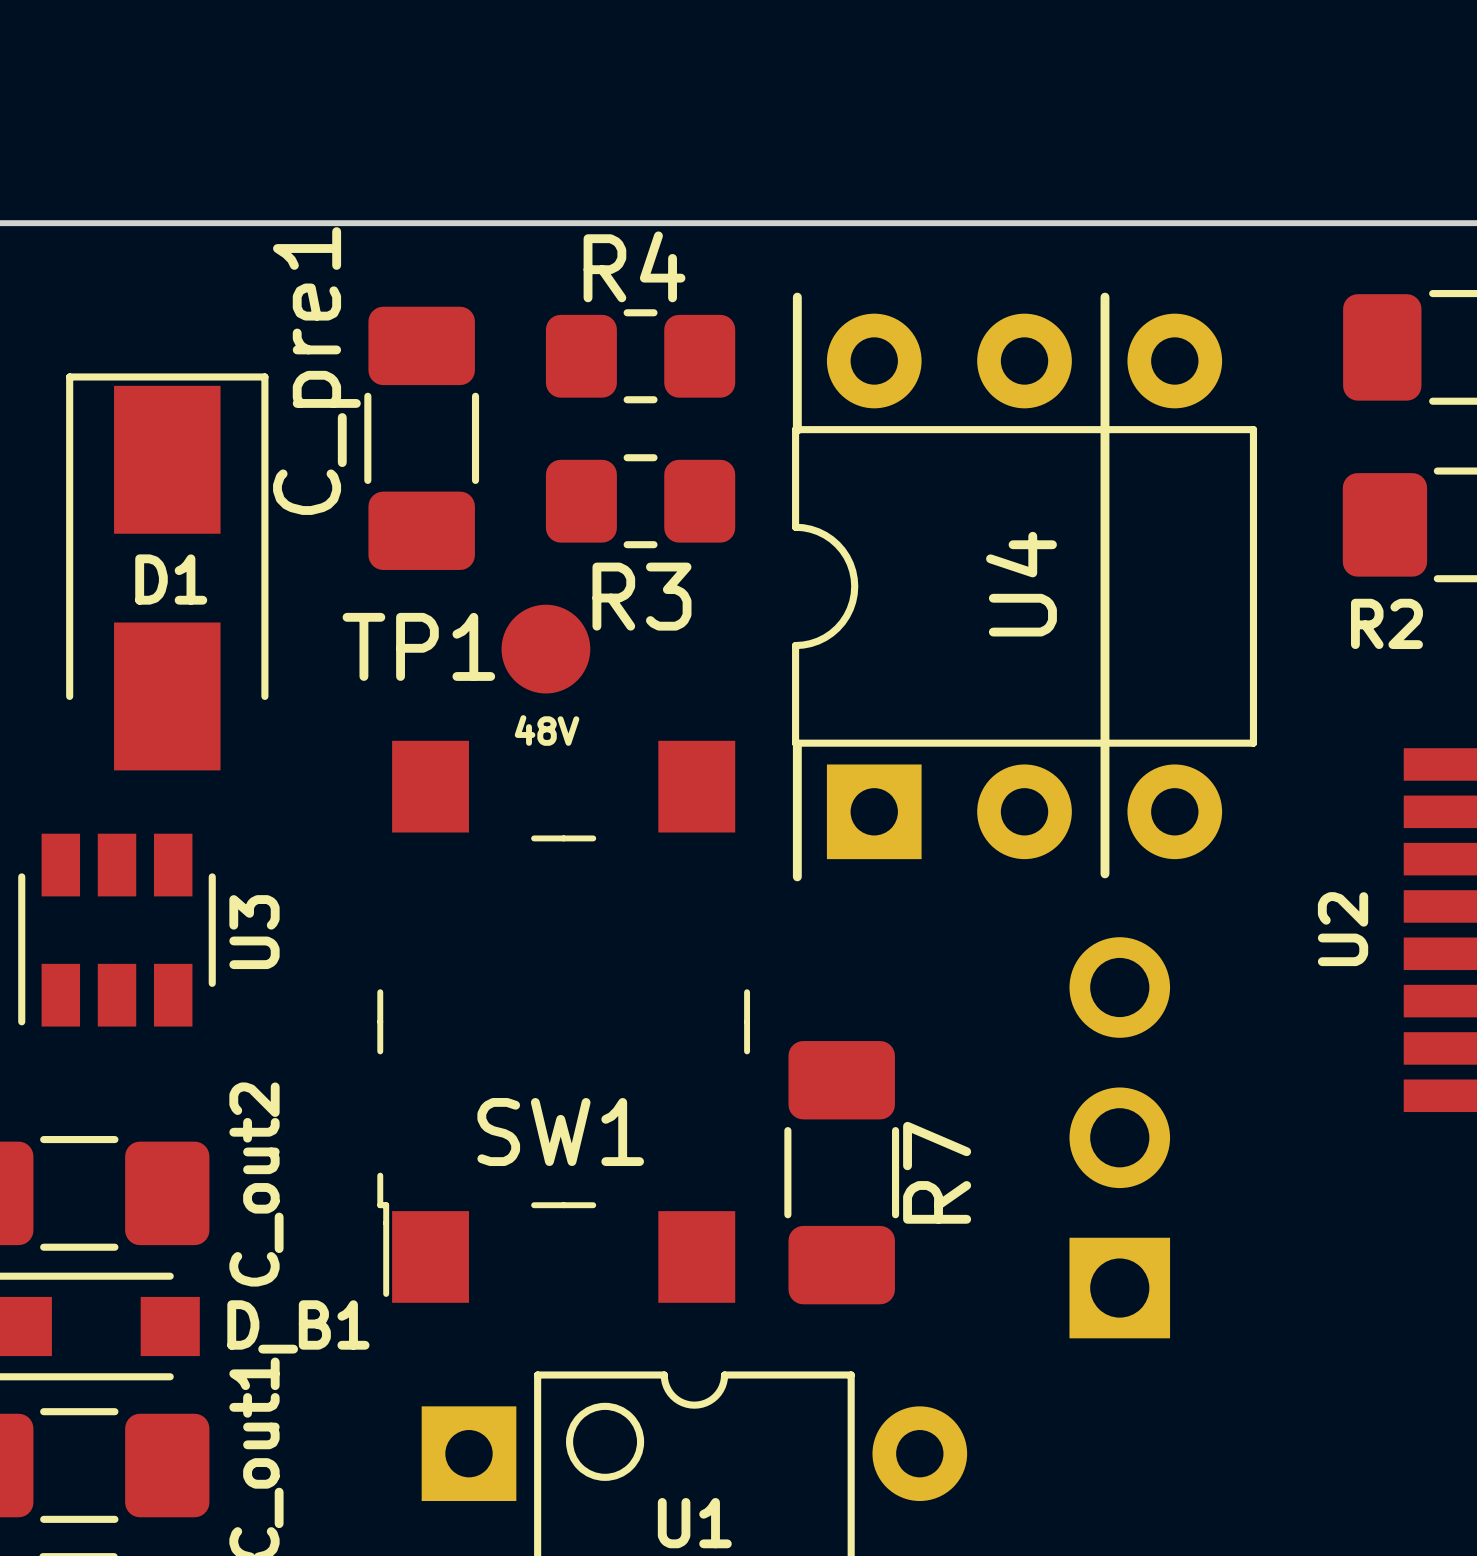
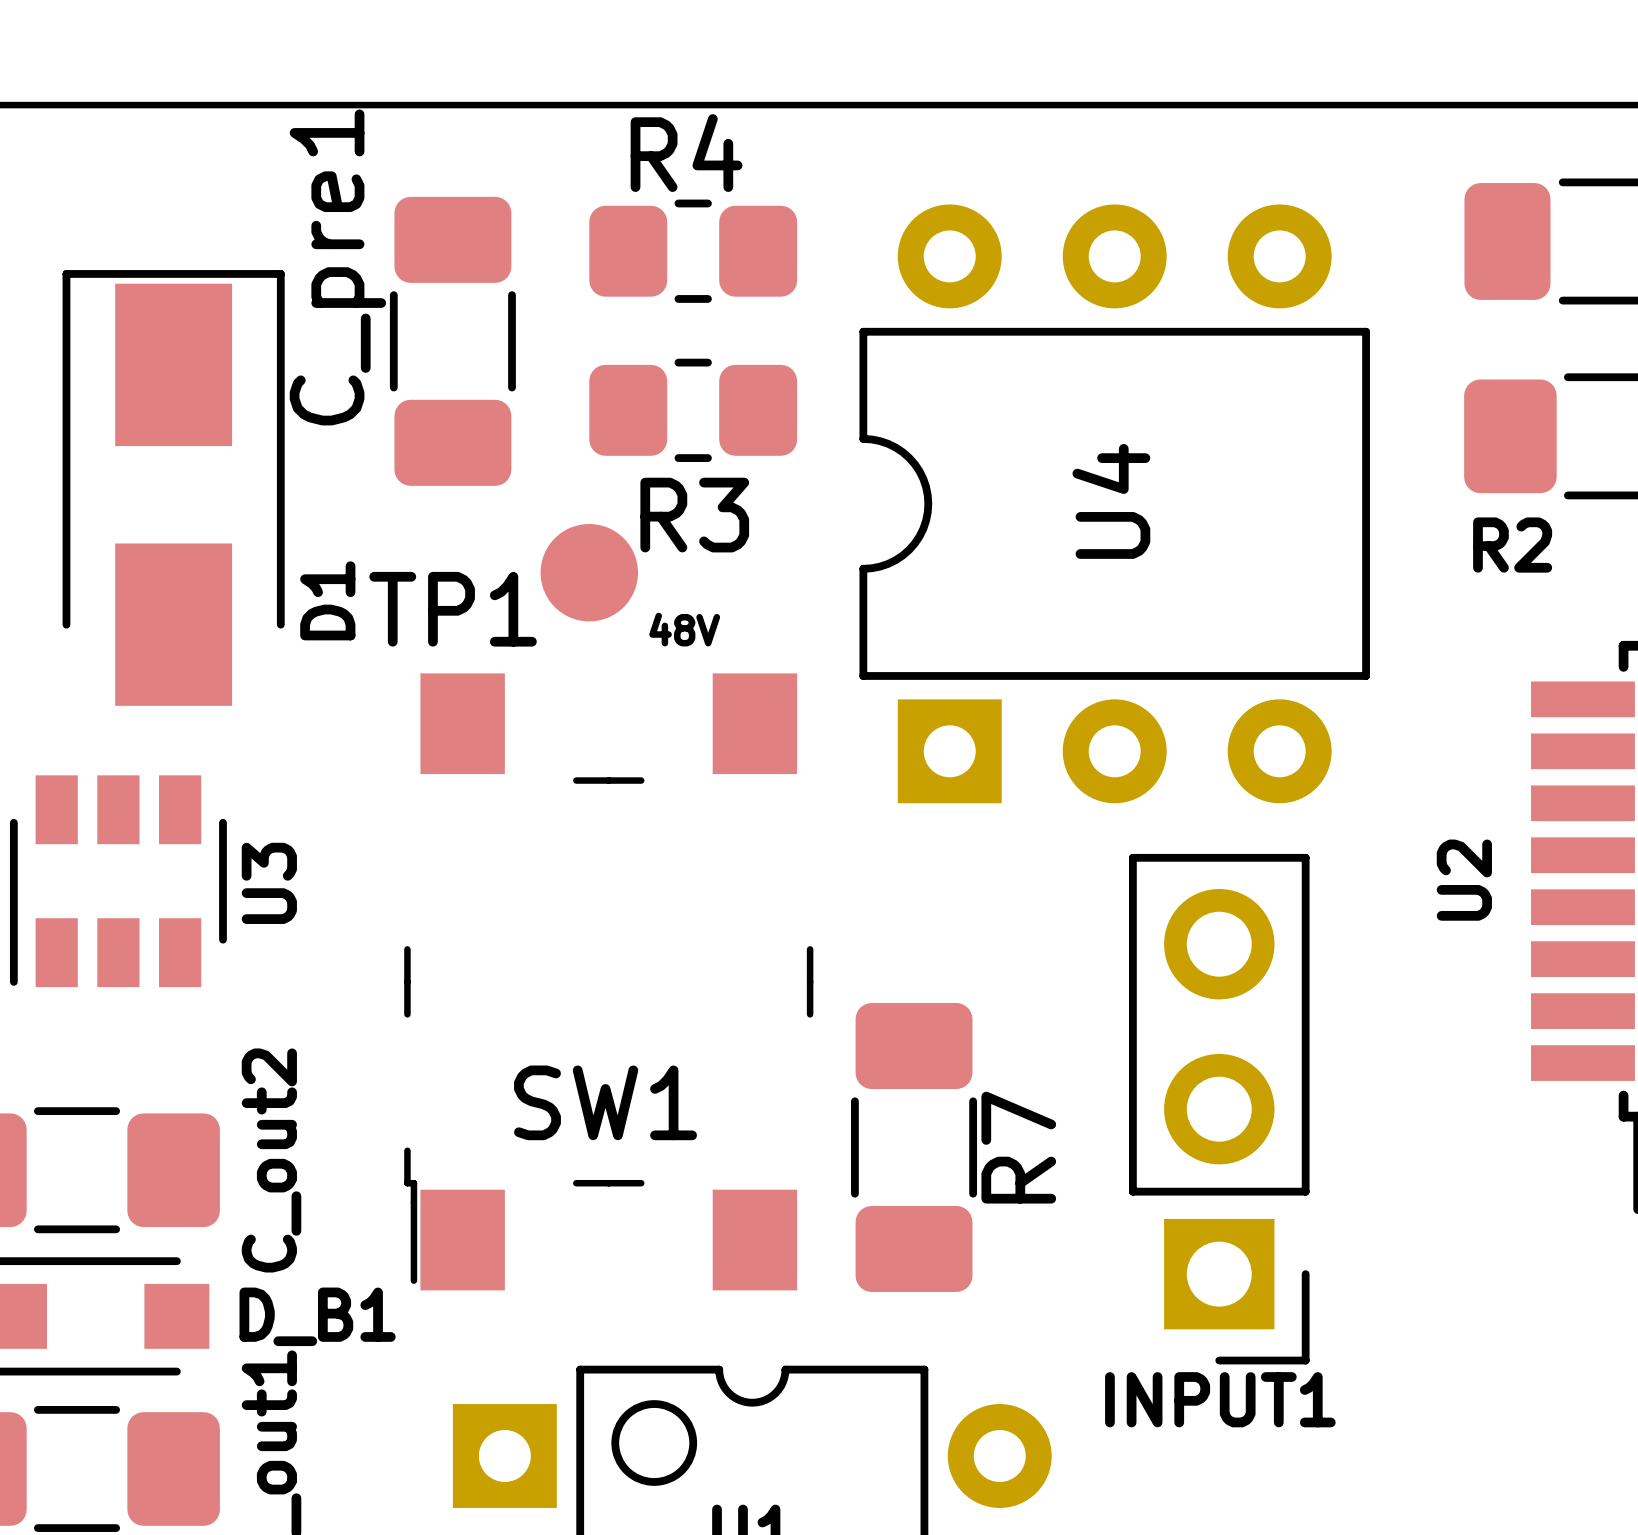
line: (797, 297) (797, 430) -> none
line: (1104, 297) (1104, 873) -> none
D1 name rotation: 0° (171, 579) -> 90° counterclockwise (327, 600)
D1 name position: D1 (171, 579) -> D1 (327, 600)
TP1 name position: TP1 (418, 646) -> TP1 (453, 609)
text position: 48V (547, 730) -> 48V (684, 629)
line: (797, 743) (797, 876) -> none
INPUT1 side: bottom (1119, 1137) -> top (1219, 1109)

